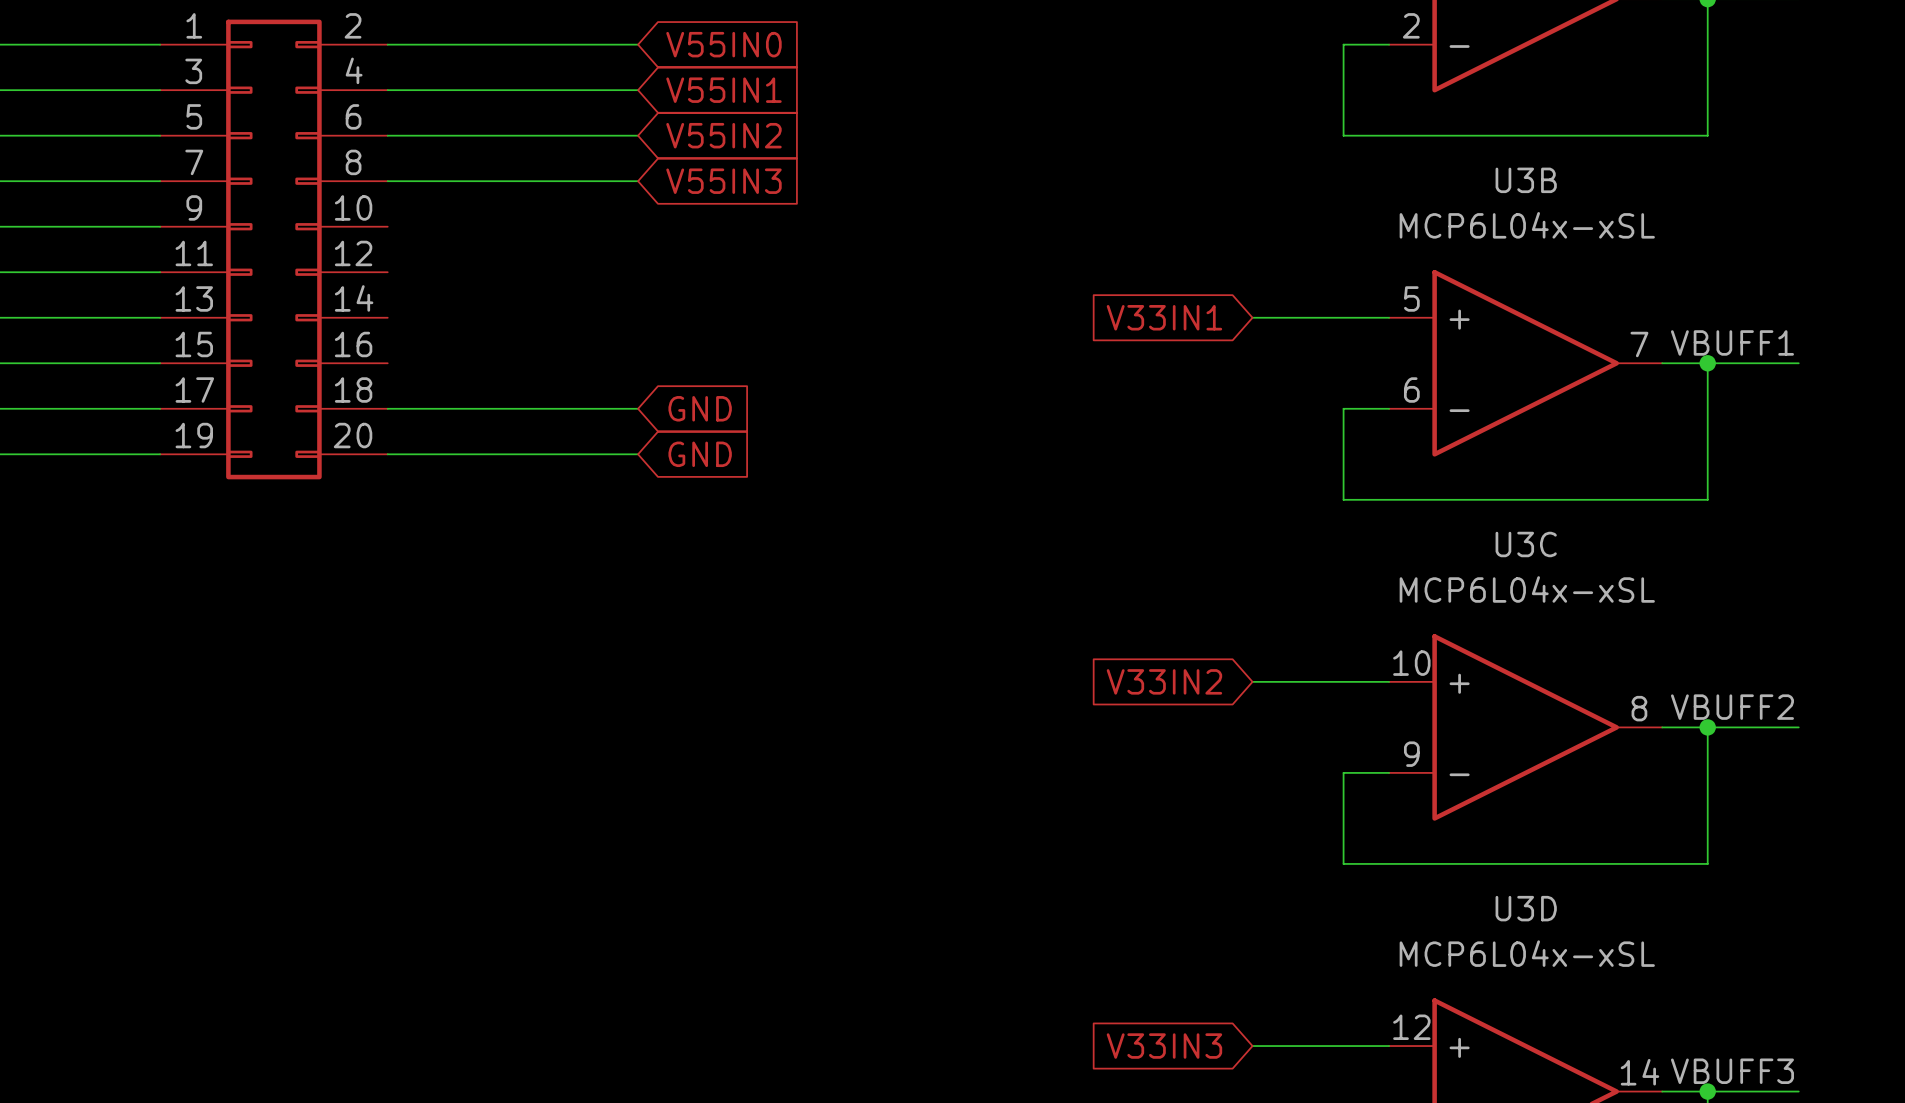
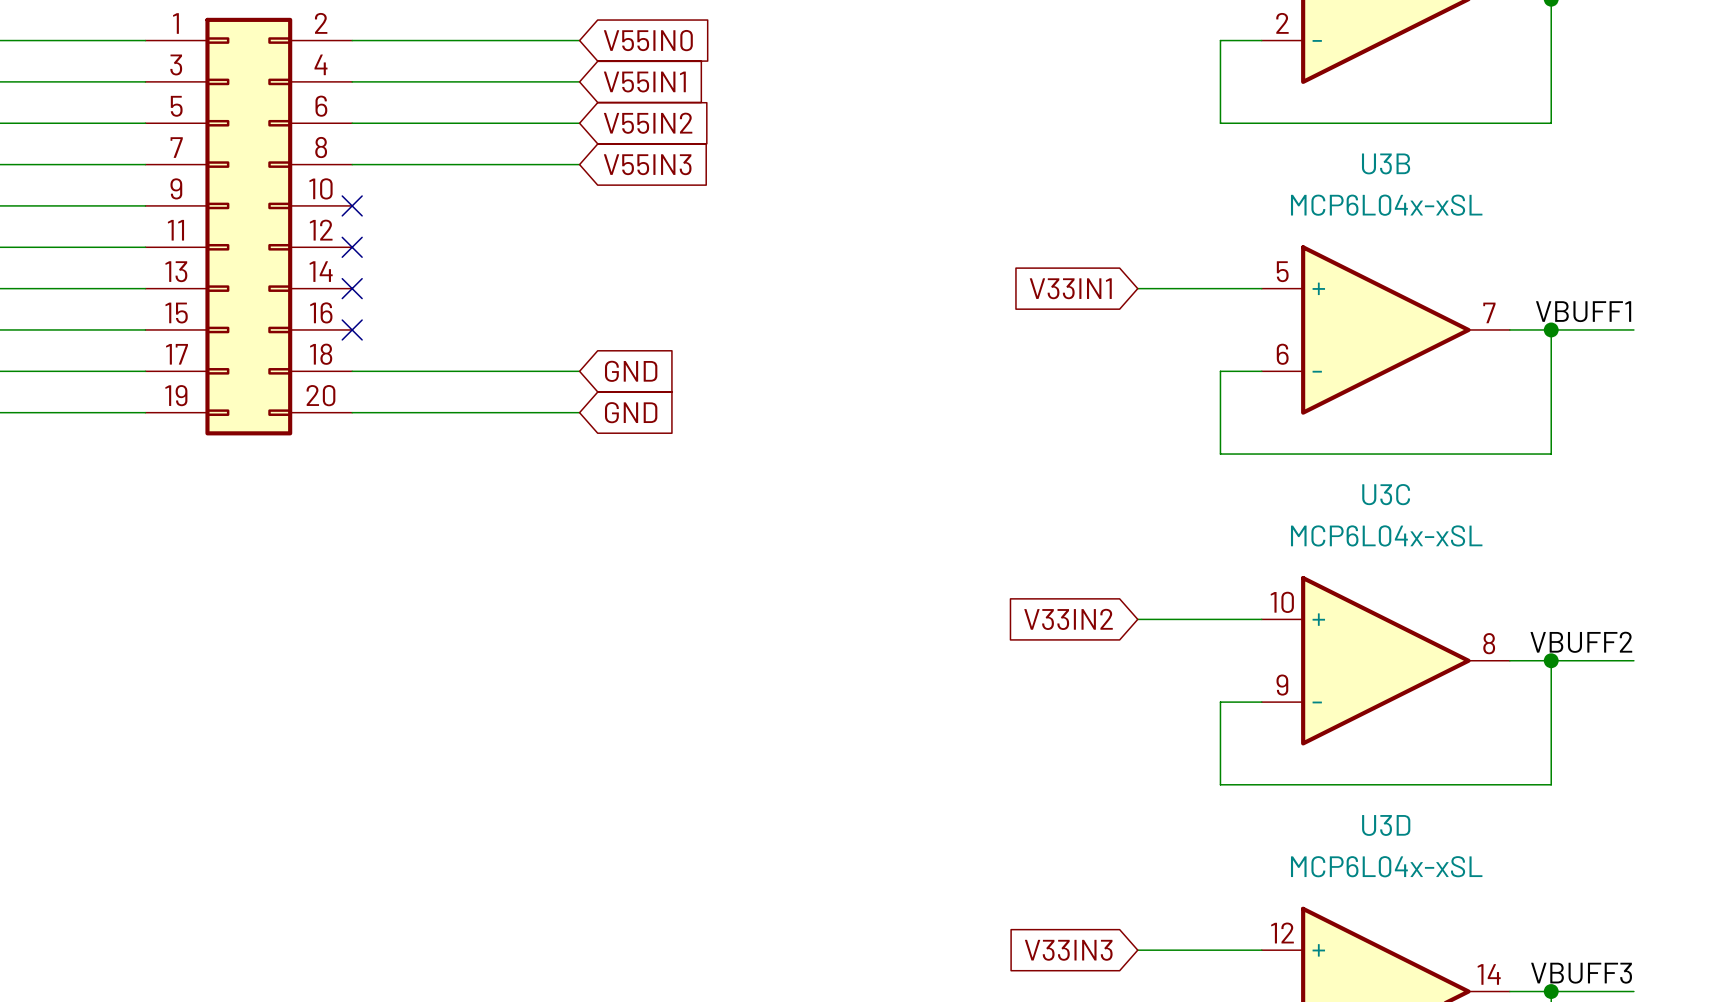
no-connect mark: none -> (352, 205)
no-connect mark: none -> (352, 247)
no-connect mark: none -> (352, 288)
no-connect mark: none -> (352, 329)

